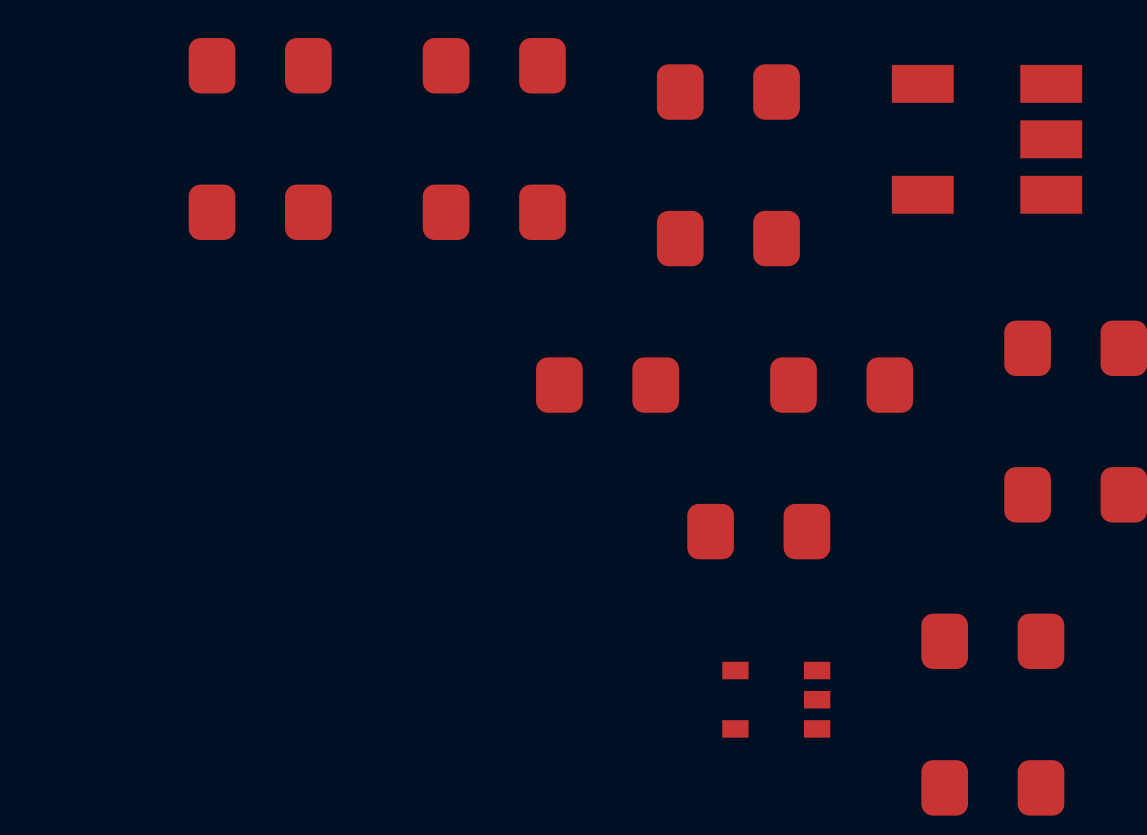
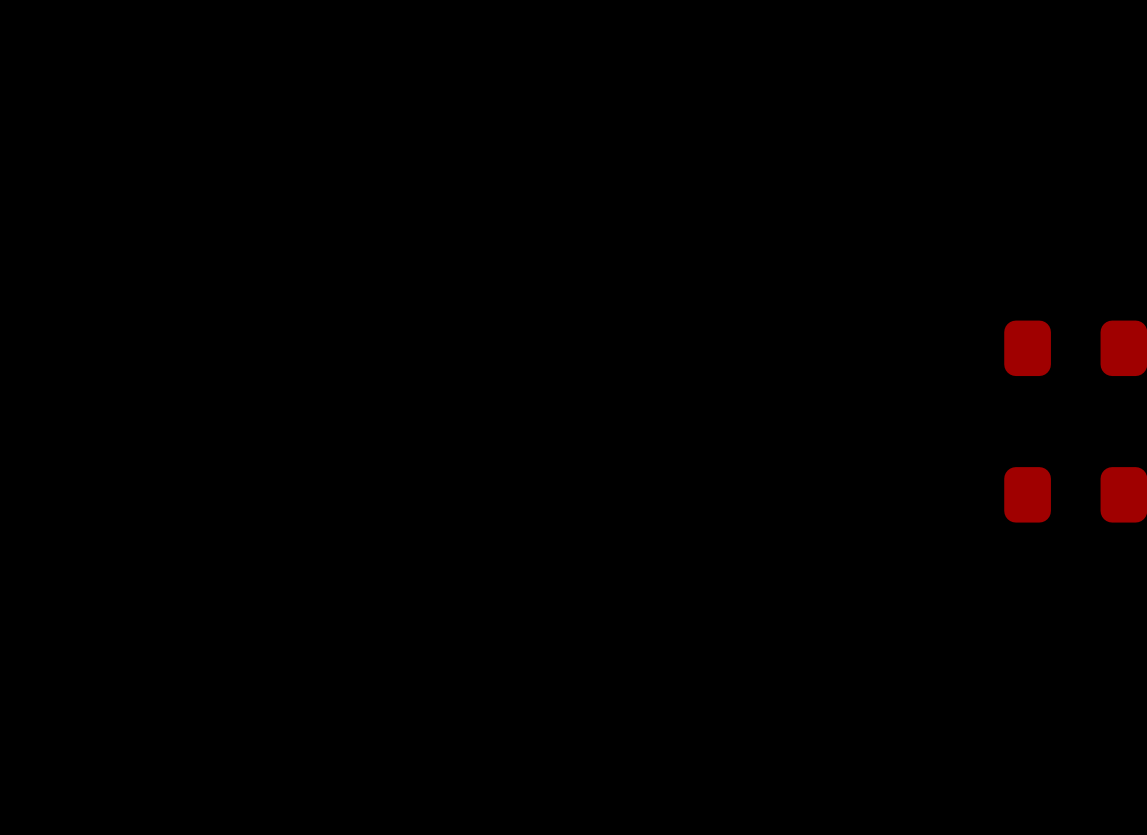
part: (260, 65) -> none
part: (494, 65) -> none
part: (728, 92) -> none
part: (987, 139) -> none
part: (260, 212) -> none
part: (494, 212) -> none
part: (728, 238) -> none
part: (607, 385) -> none
part: (841, 385) -> none
part: (758, 531) -> none
part: (992, 641) -> none
part: (776, 699) -> none
part: (992, 787) -> none

